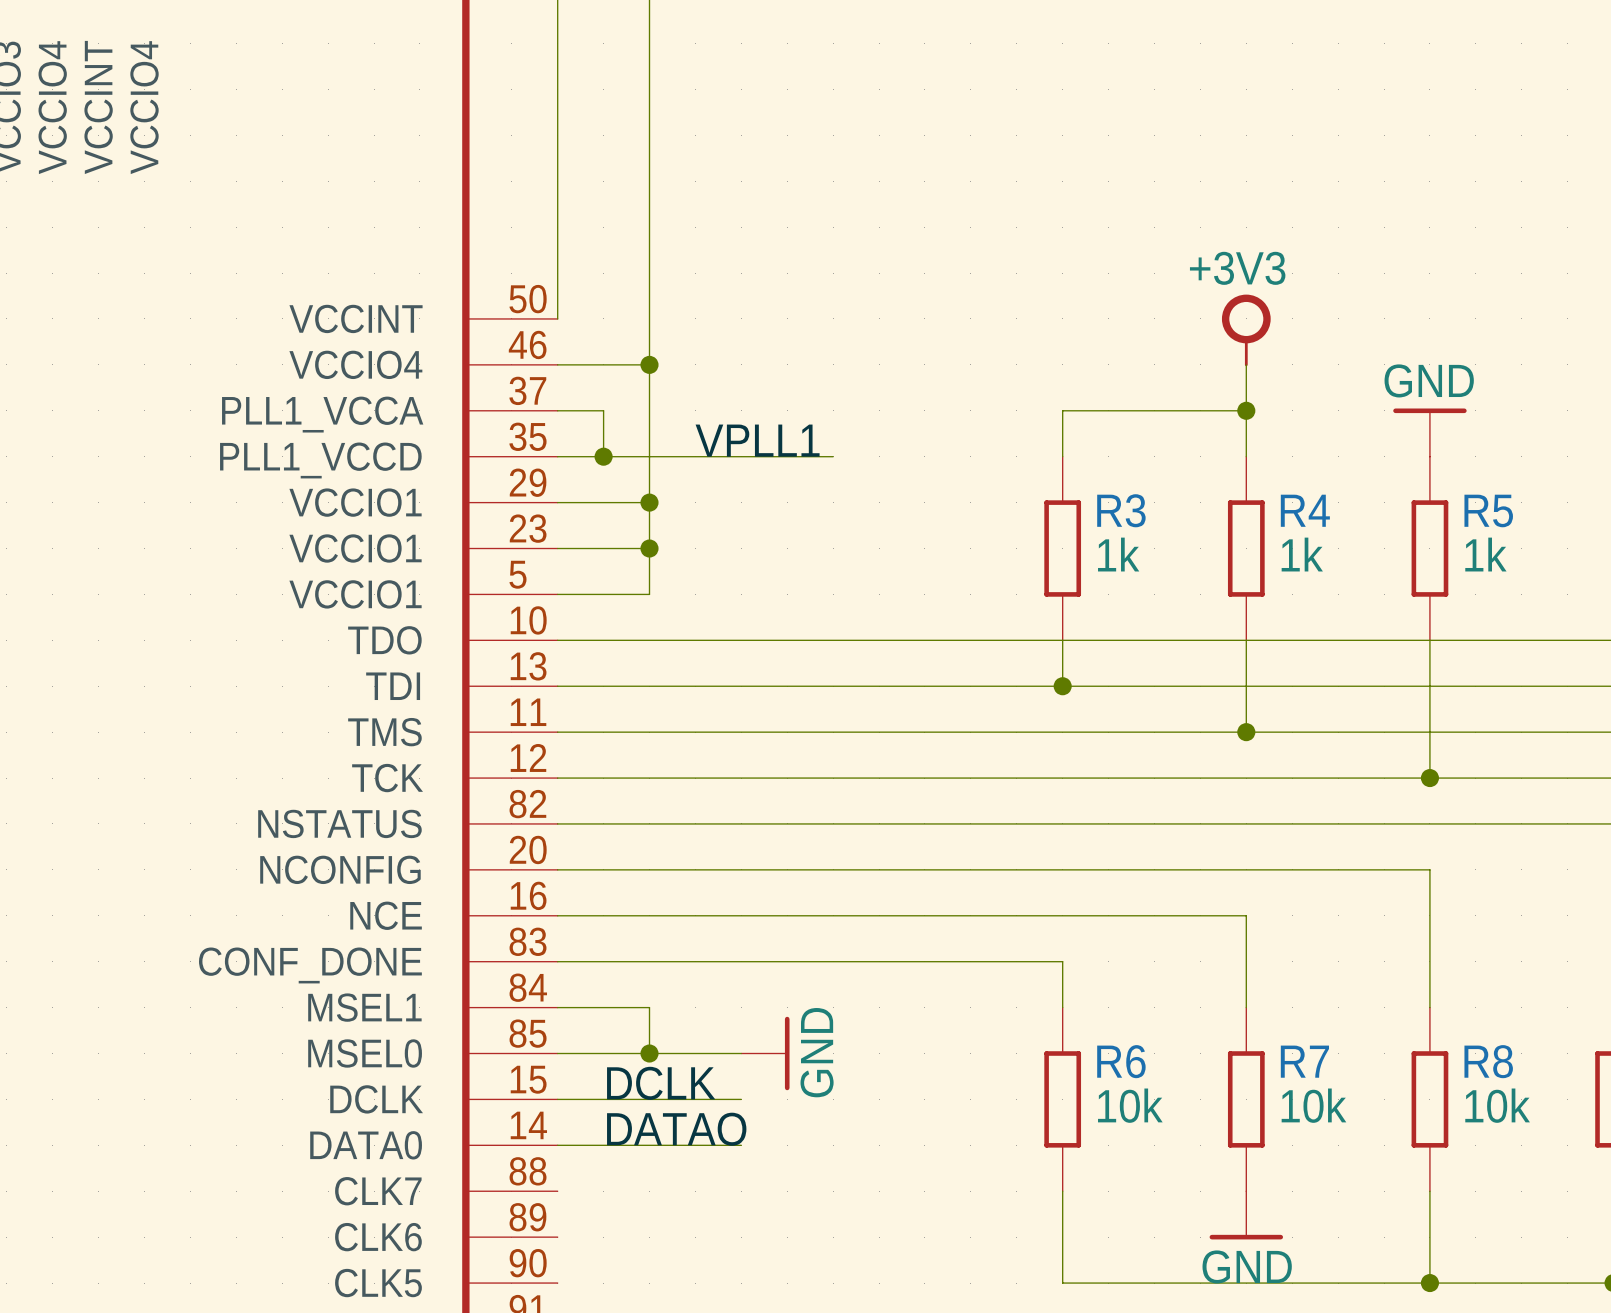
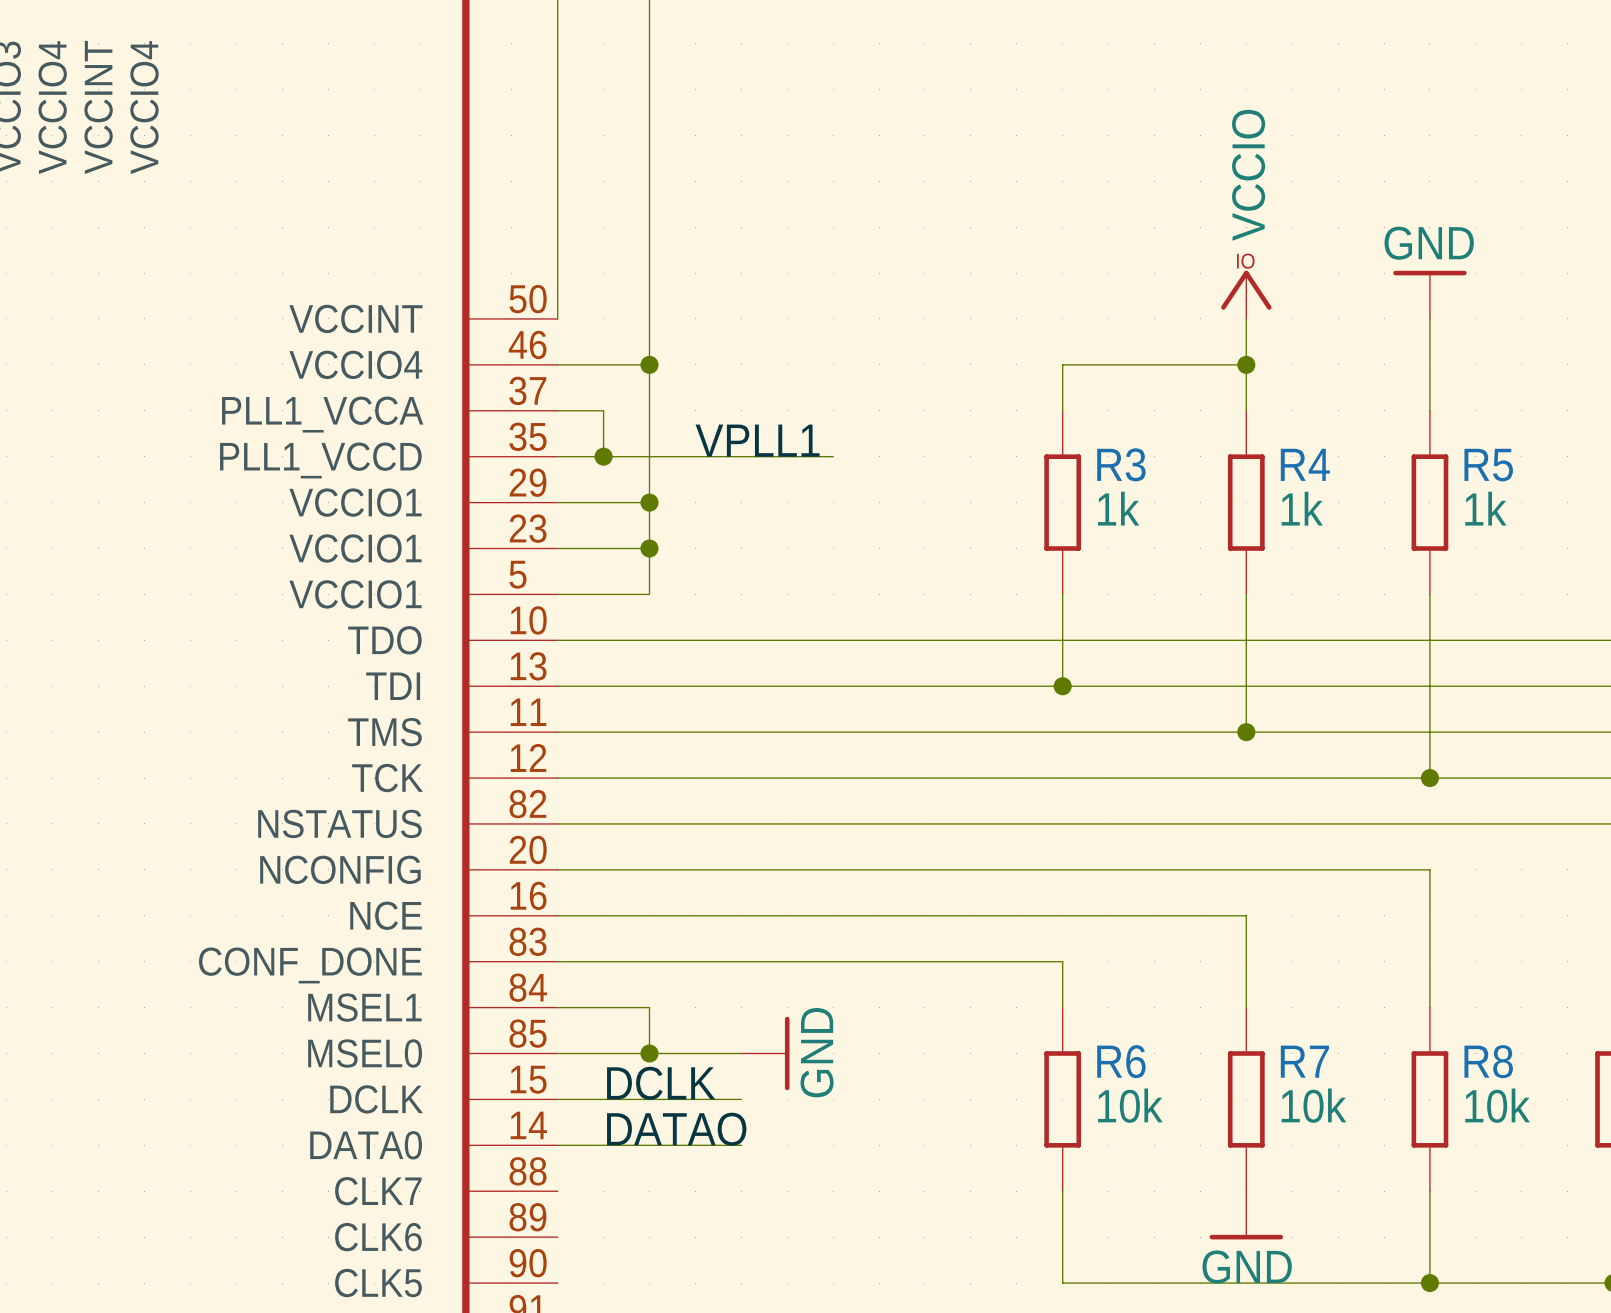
power symbol: none -> VCCIO (1246, 294)
wire: none -> (1246, 318) (1246, 364) (1062, 364) (1062, 410)
wire: none -> (1429, 318) (1429, 410)
power symbol: +3V3 (1246, 330) -> none
junction position: (1246, 410) -> (1246, 364)
power symbol position: GND (1429, 432) -> GND (1429, 294)
wire: (1062, 456) (1062, 410) (1246, 410) (1246, 456) -> none
R3 position: (1062, 548) -> (1062, 502)
R4 position: (1246, 548) -> (1246, 502)
R5 position: (1429, 548) -> (1429, 502)

